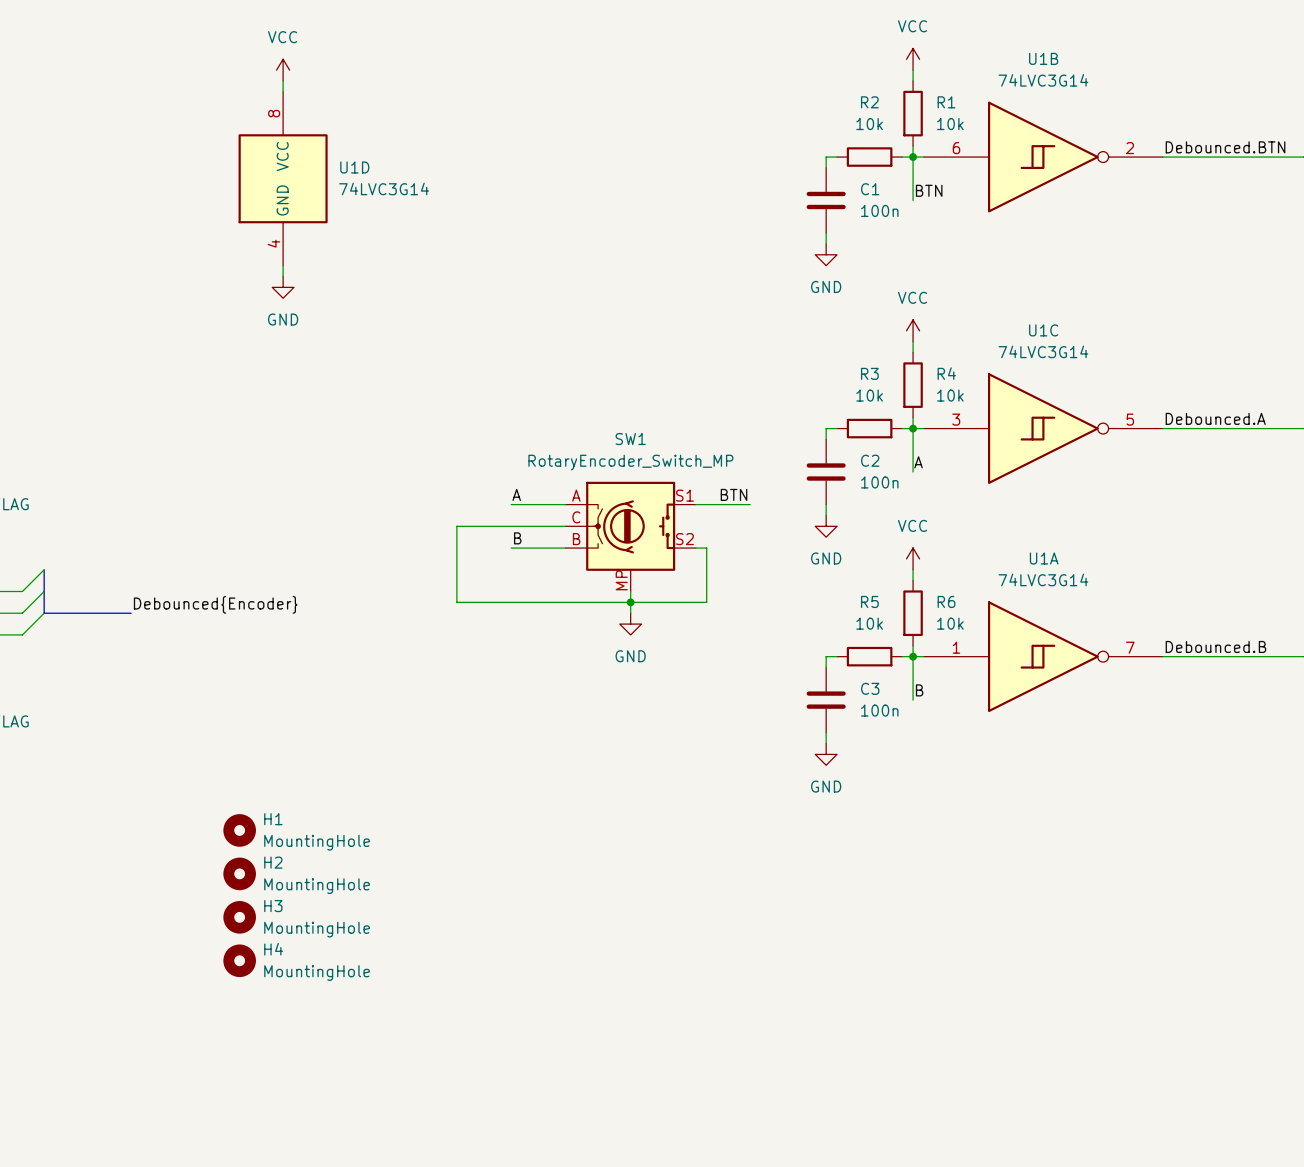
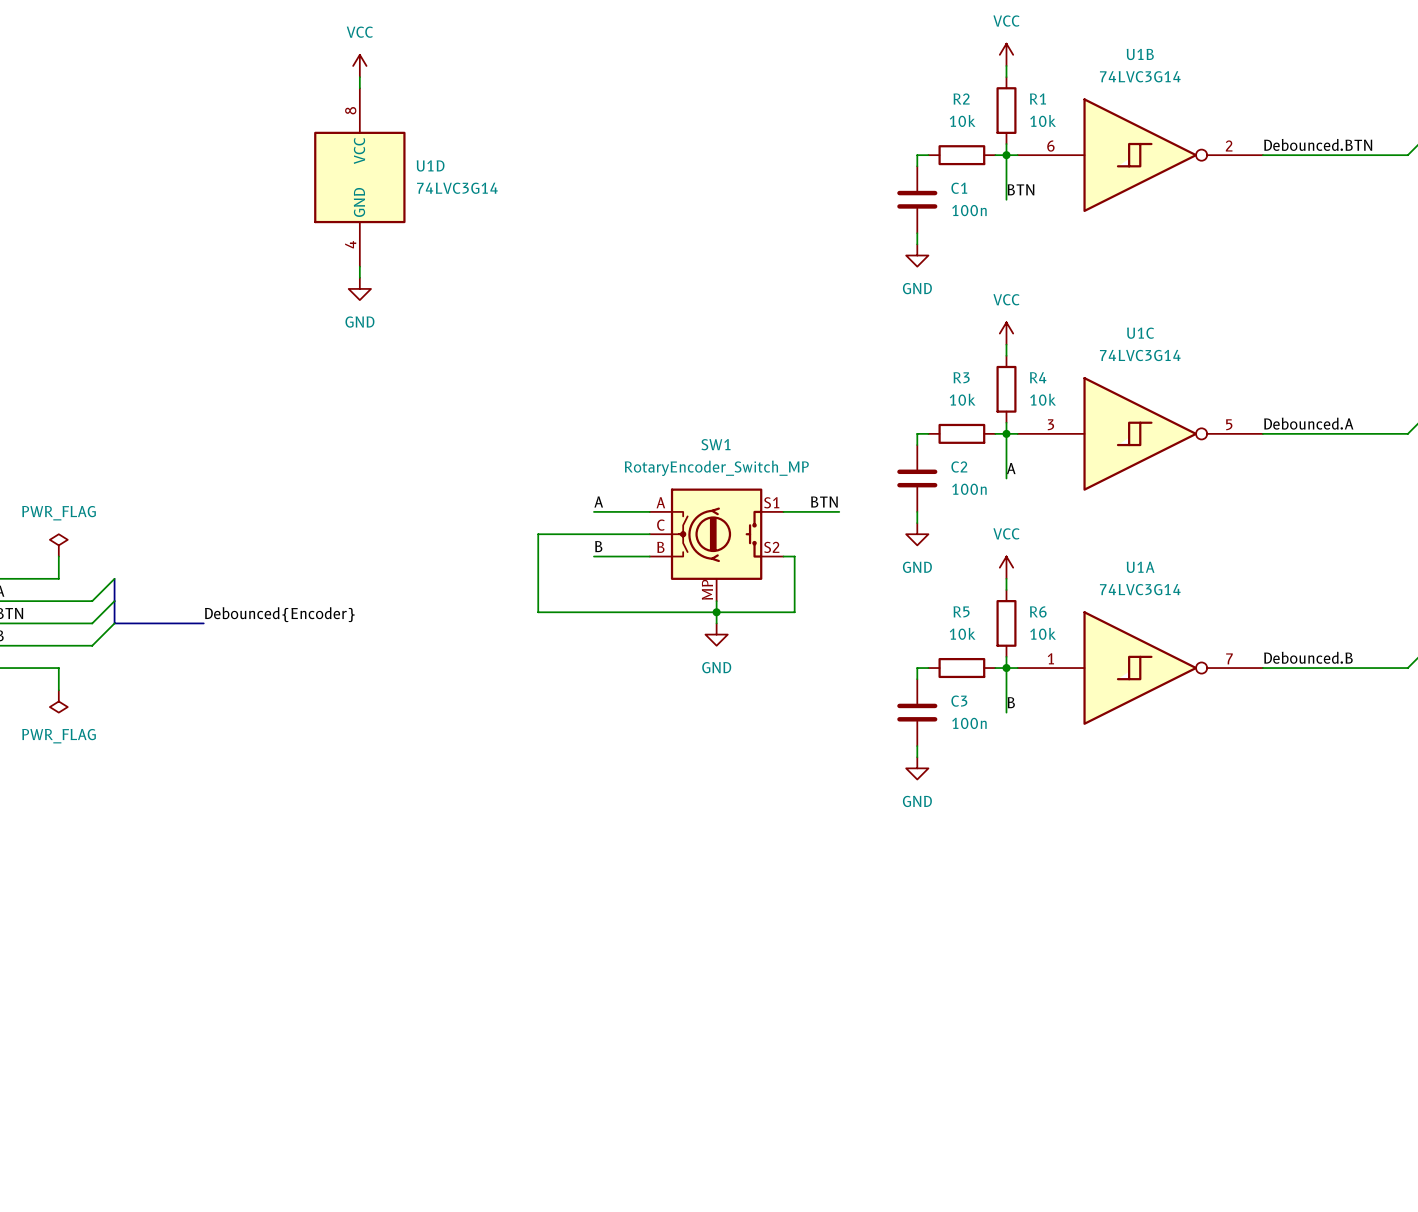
H1: MountingHole (239, 830) -> none
H2: MountingHole (239, 873) -> none
H3: MountingHole (239, 917) -> none
H4: MountingHole (239, 960) -> none

